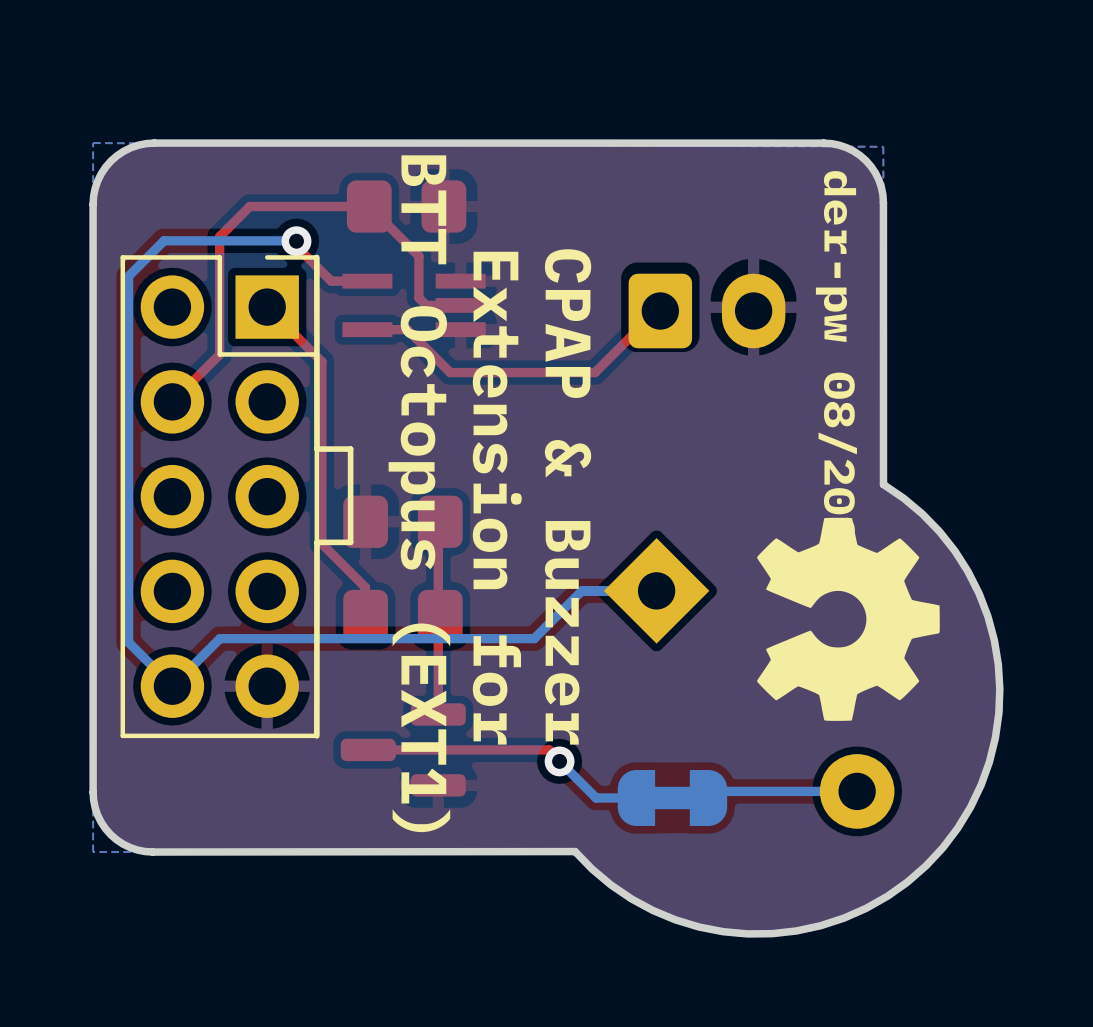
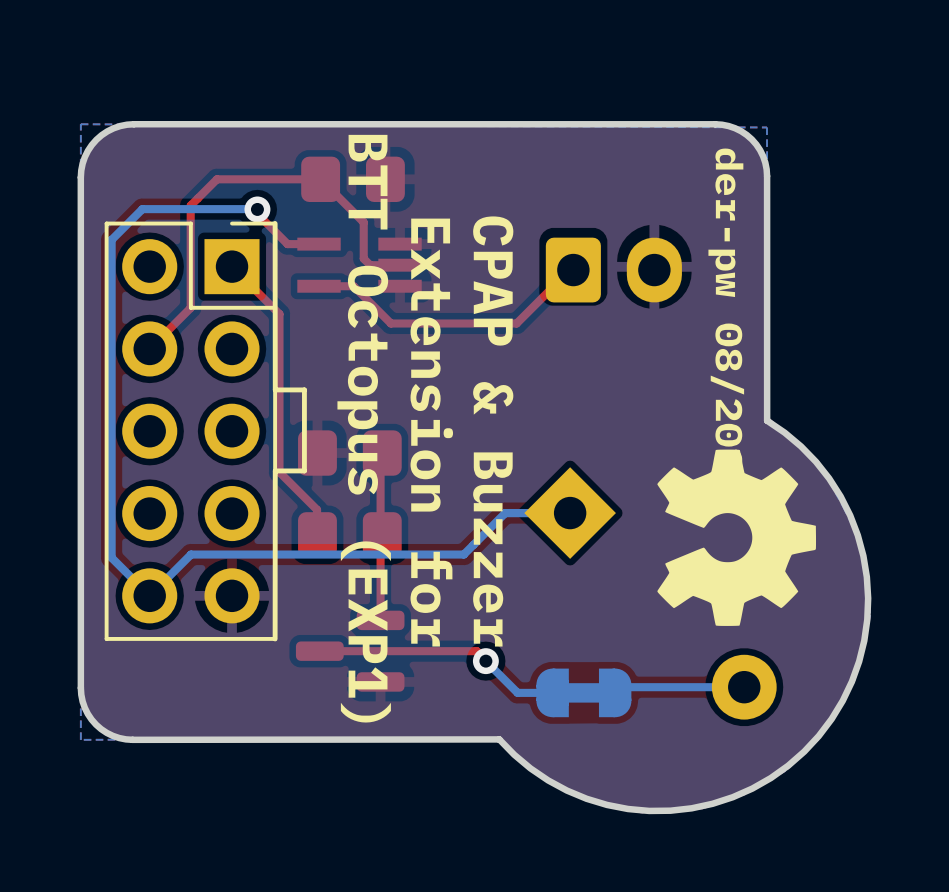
text: BTT Octopus (EXT1) (419, 493) -> BTT Octopus (EXP1) (364, 428)

